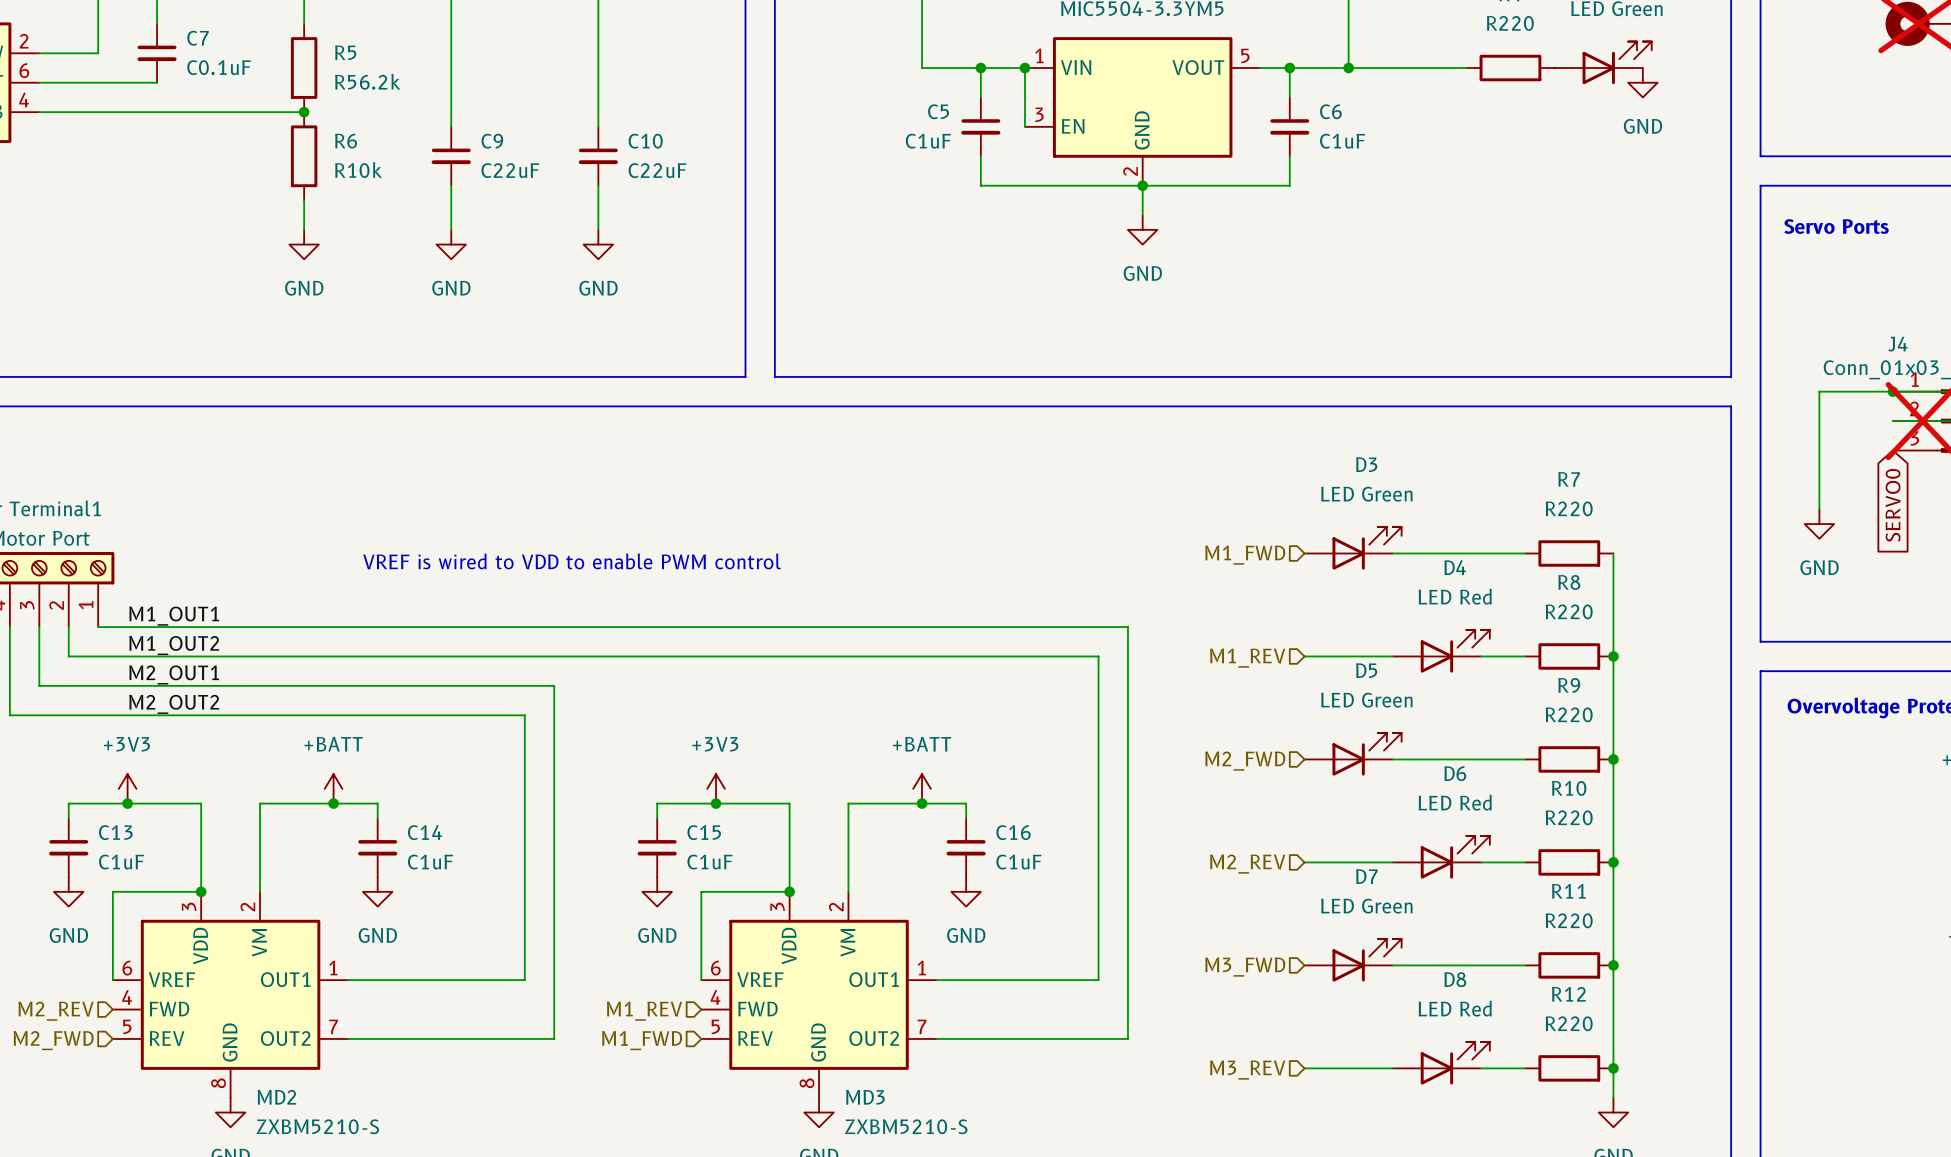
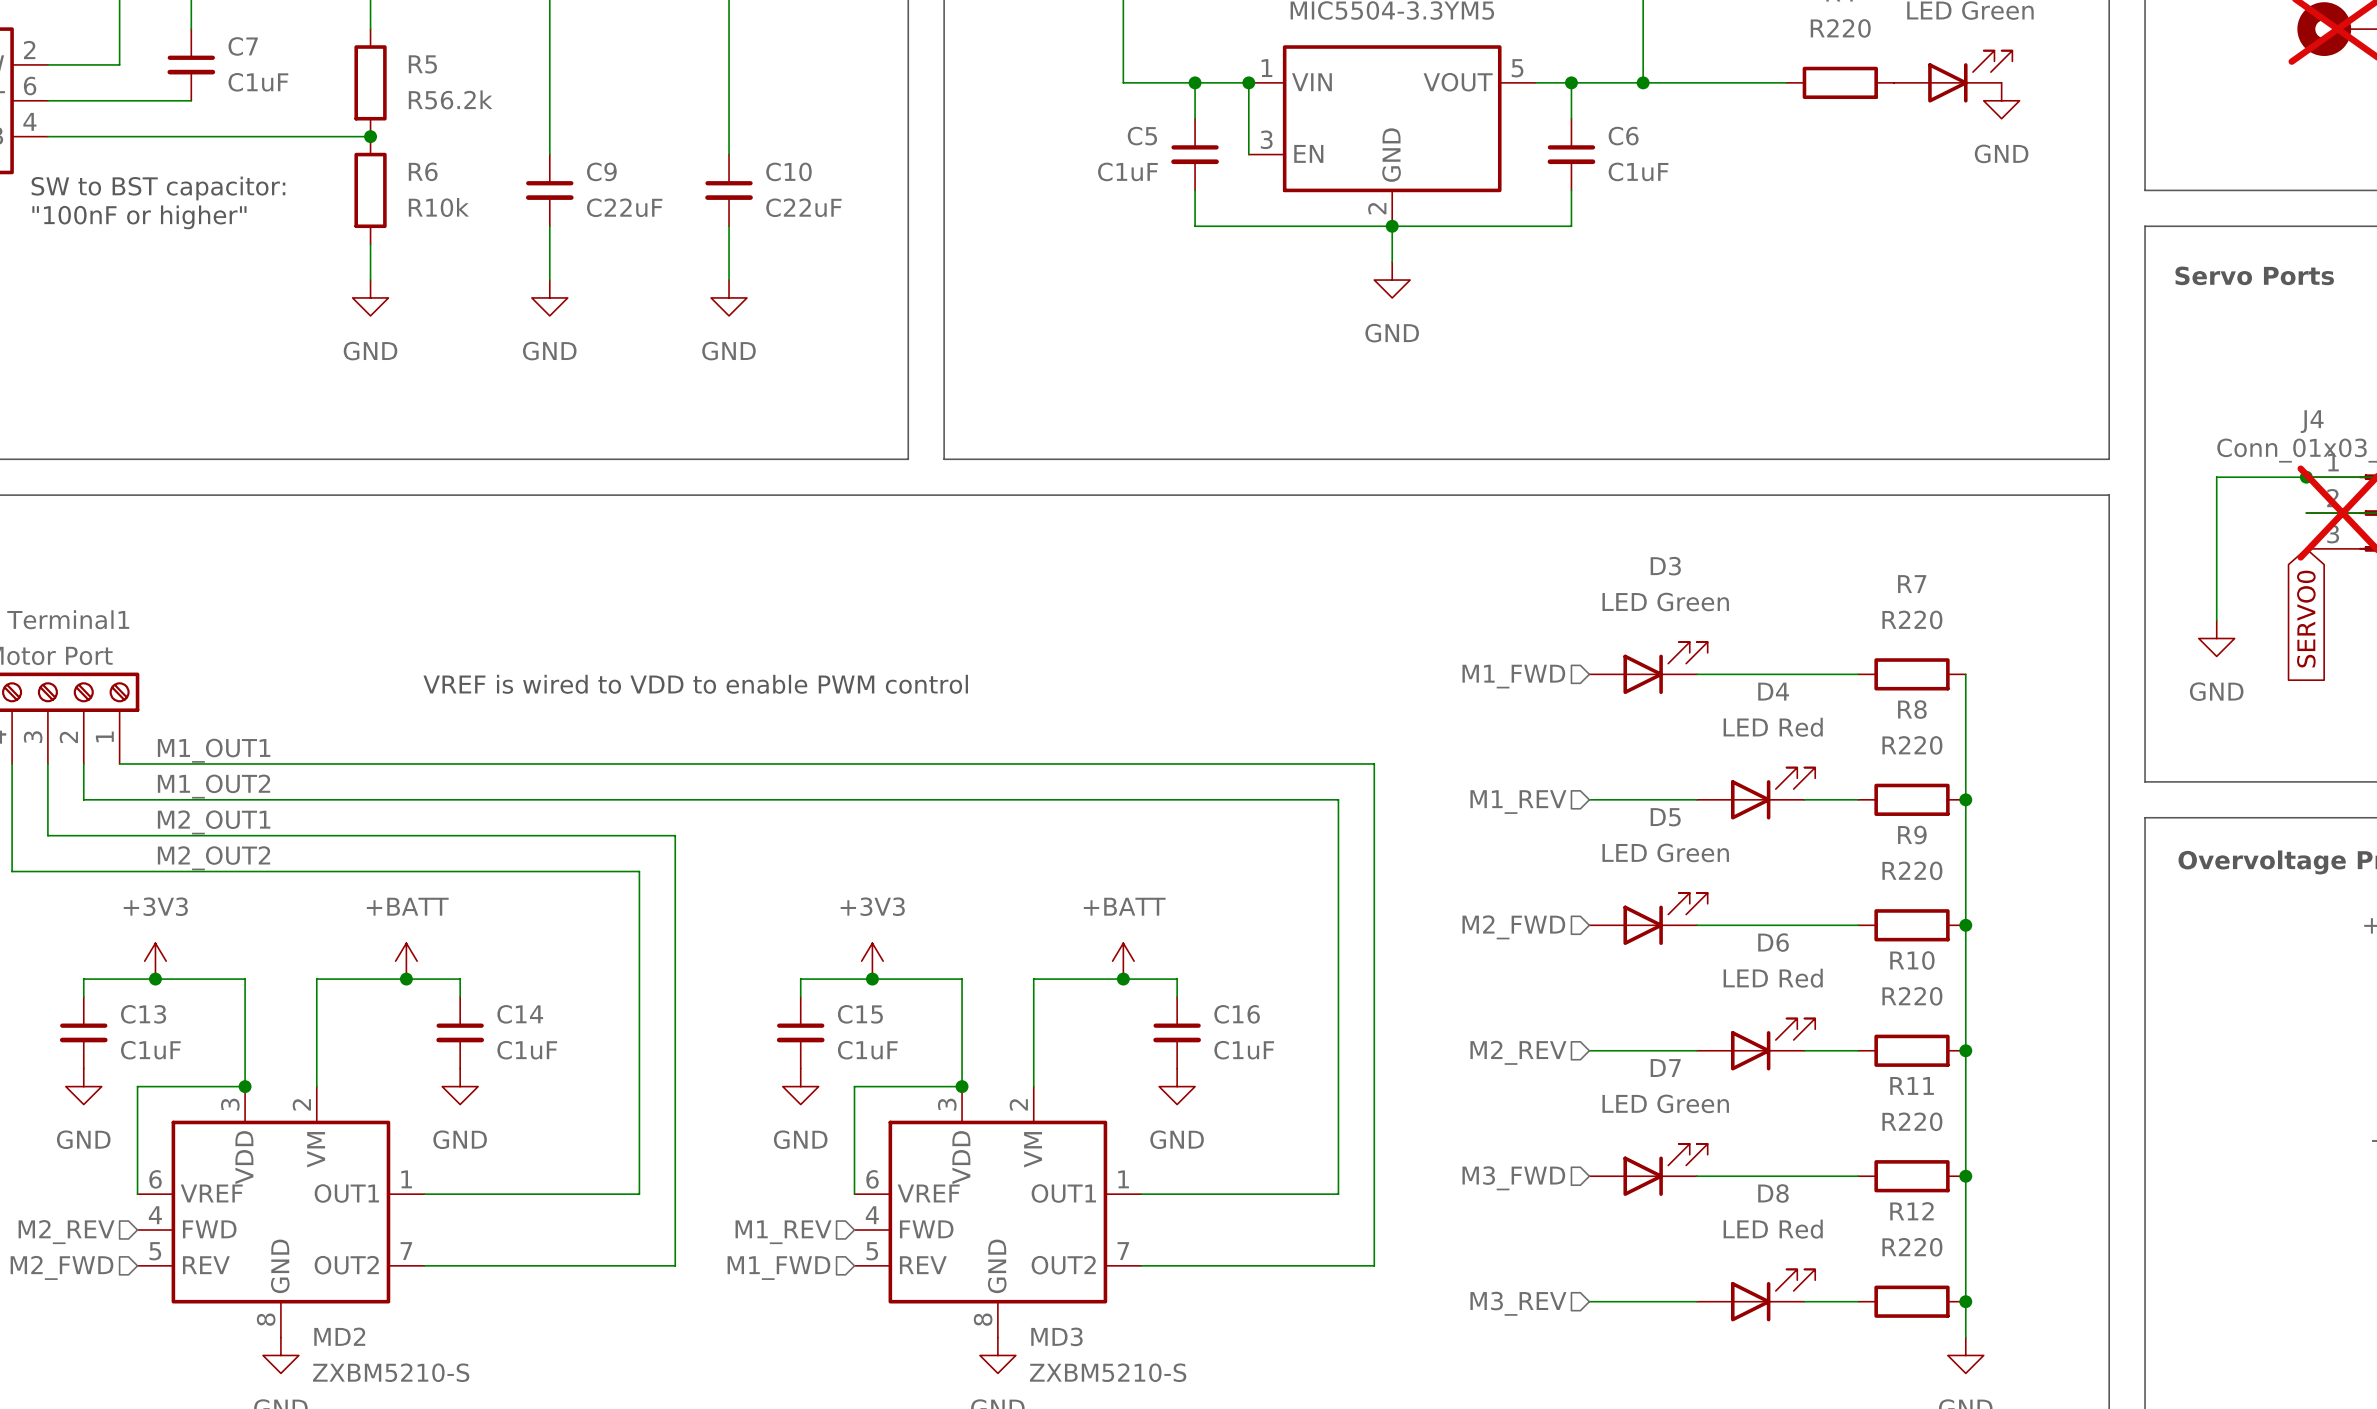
C7 value: C0.1uF (219, 67) -> C1uF (258, 82)
text: none -> SW to BST capacitor: (158, 188)
text: none -> "100nF or higher" (139, 217)

